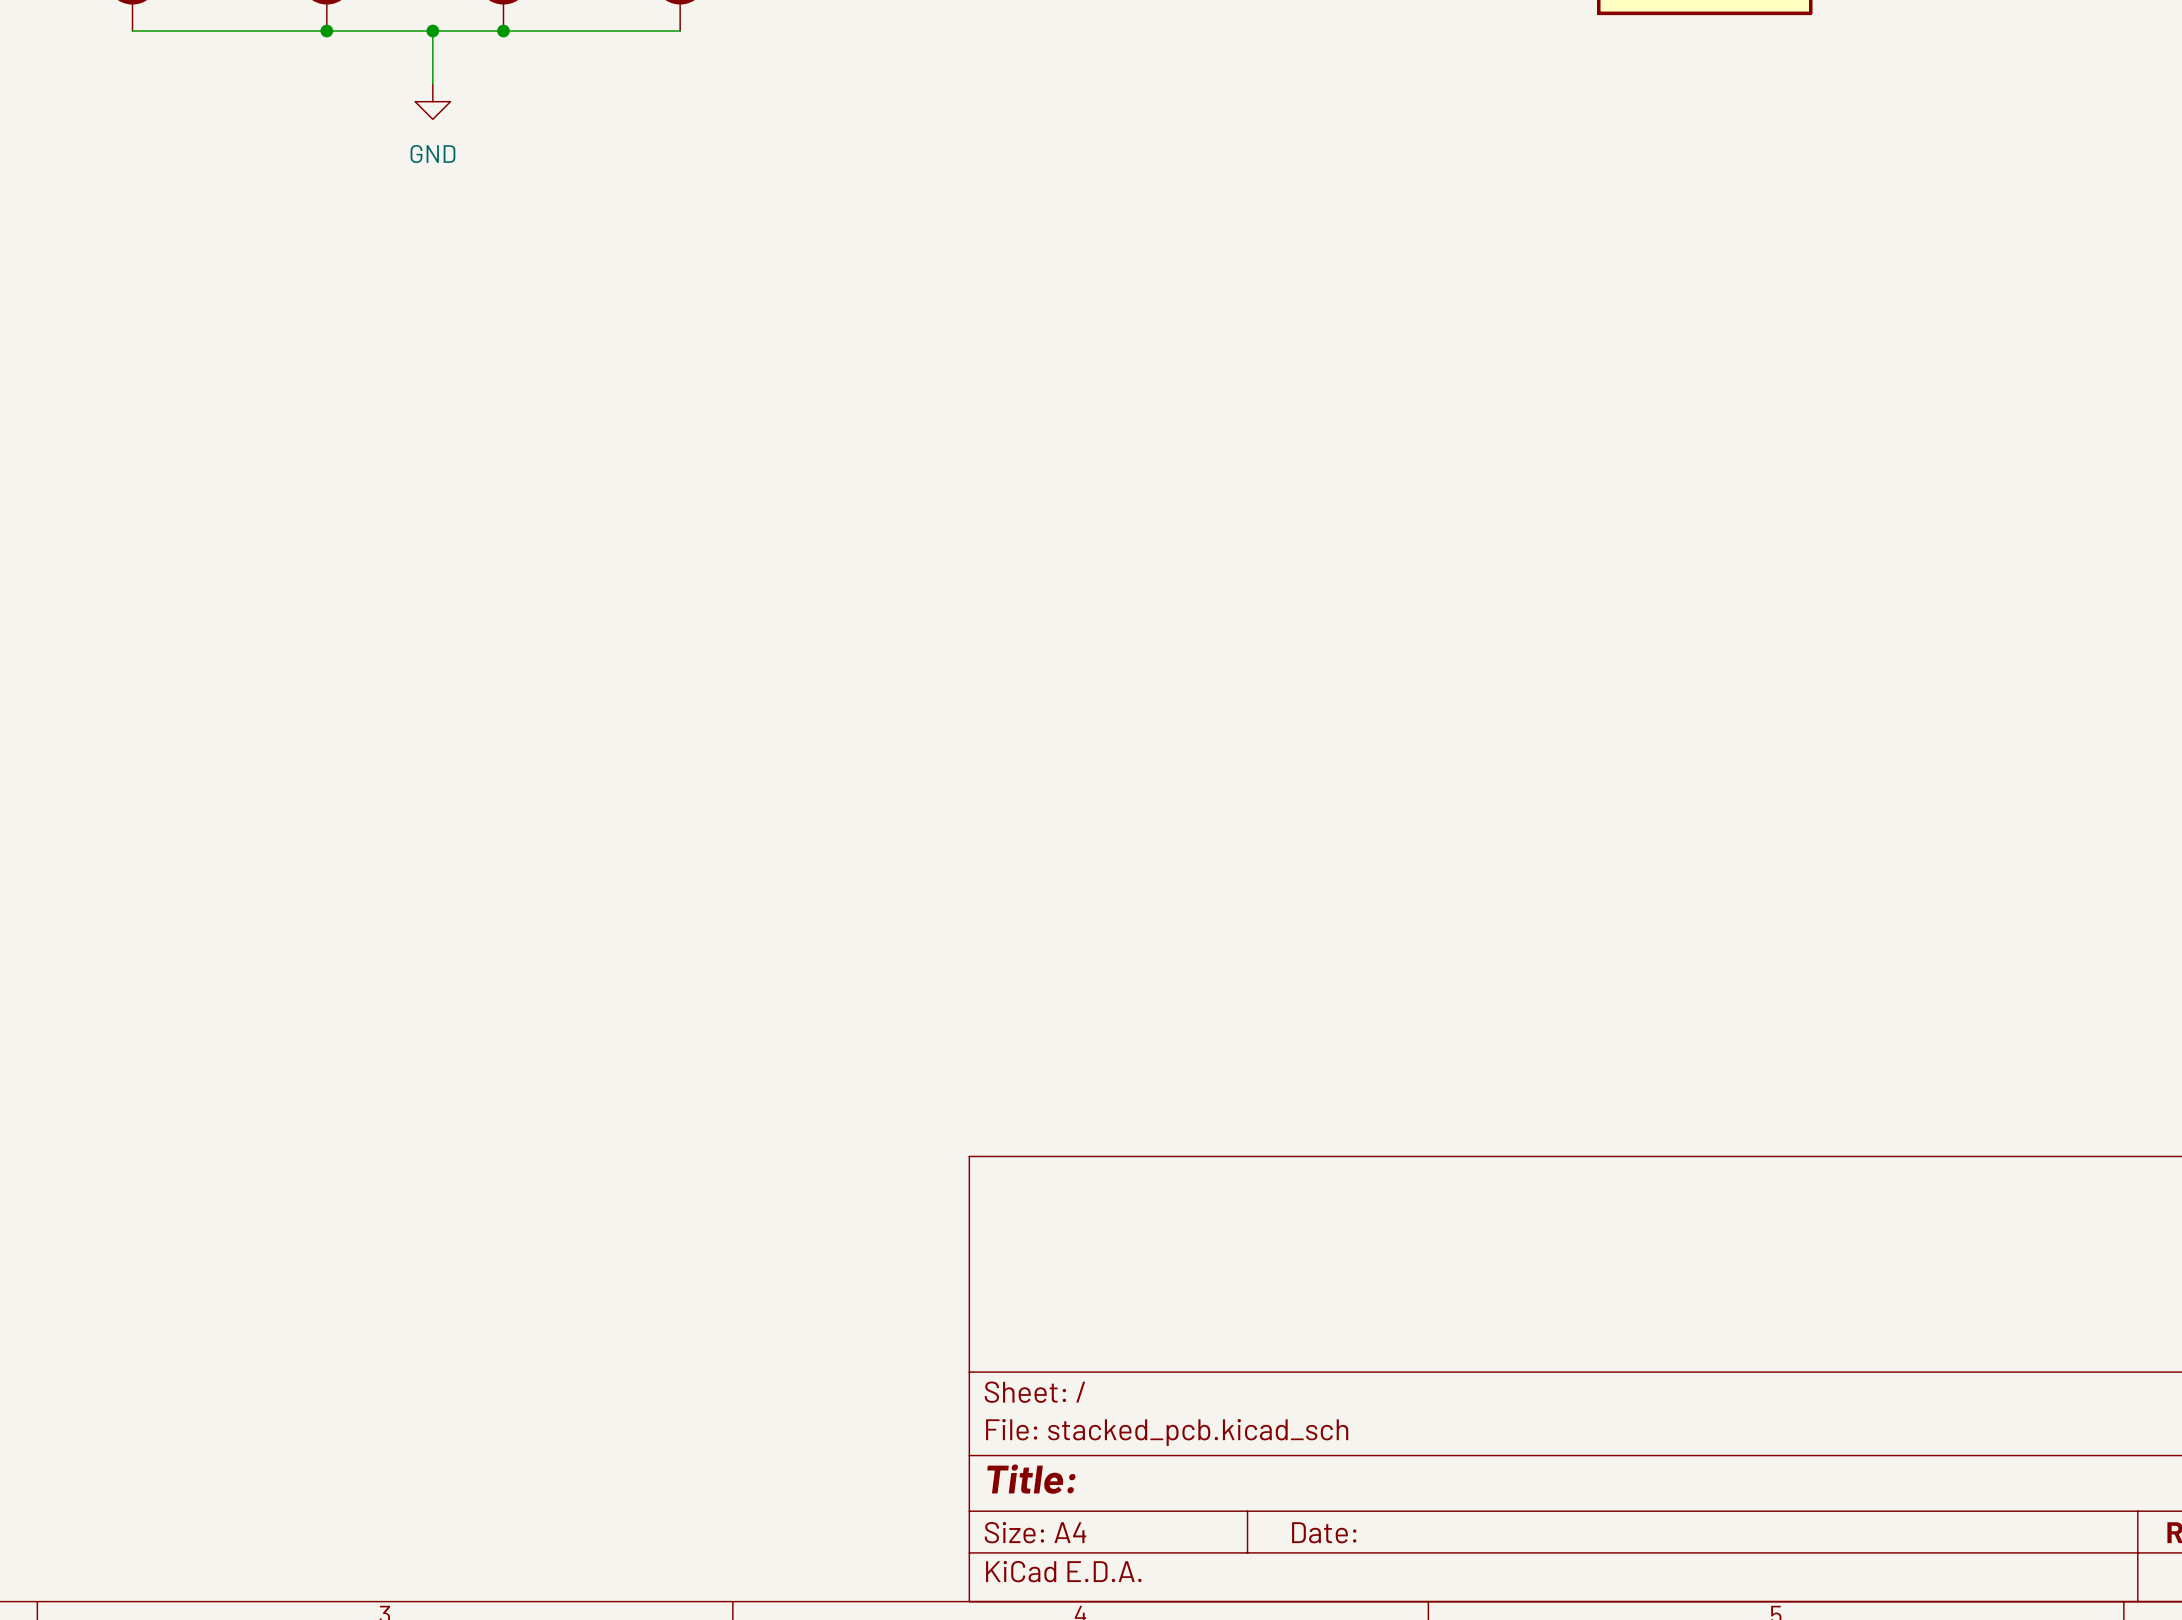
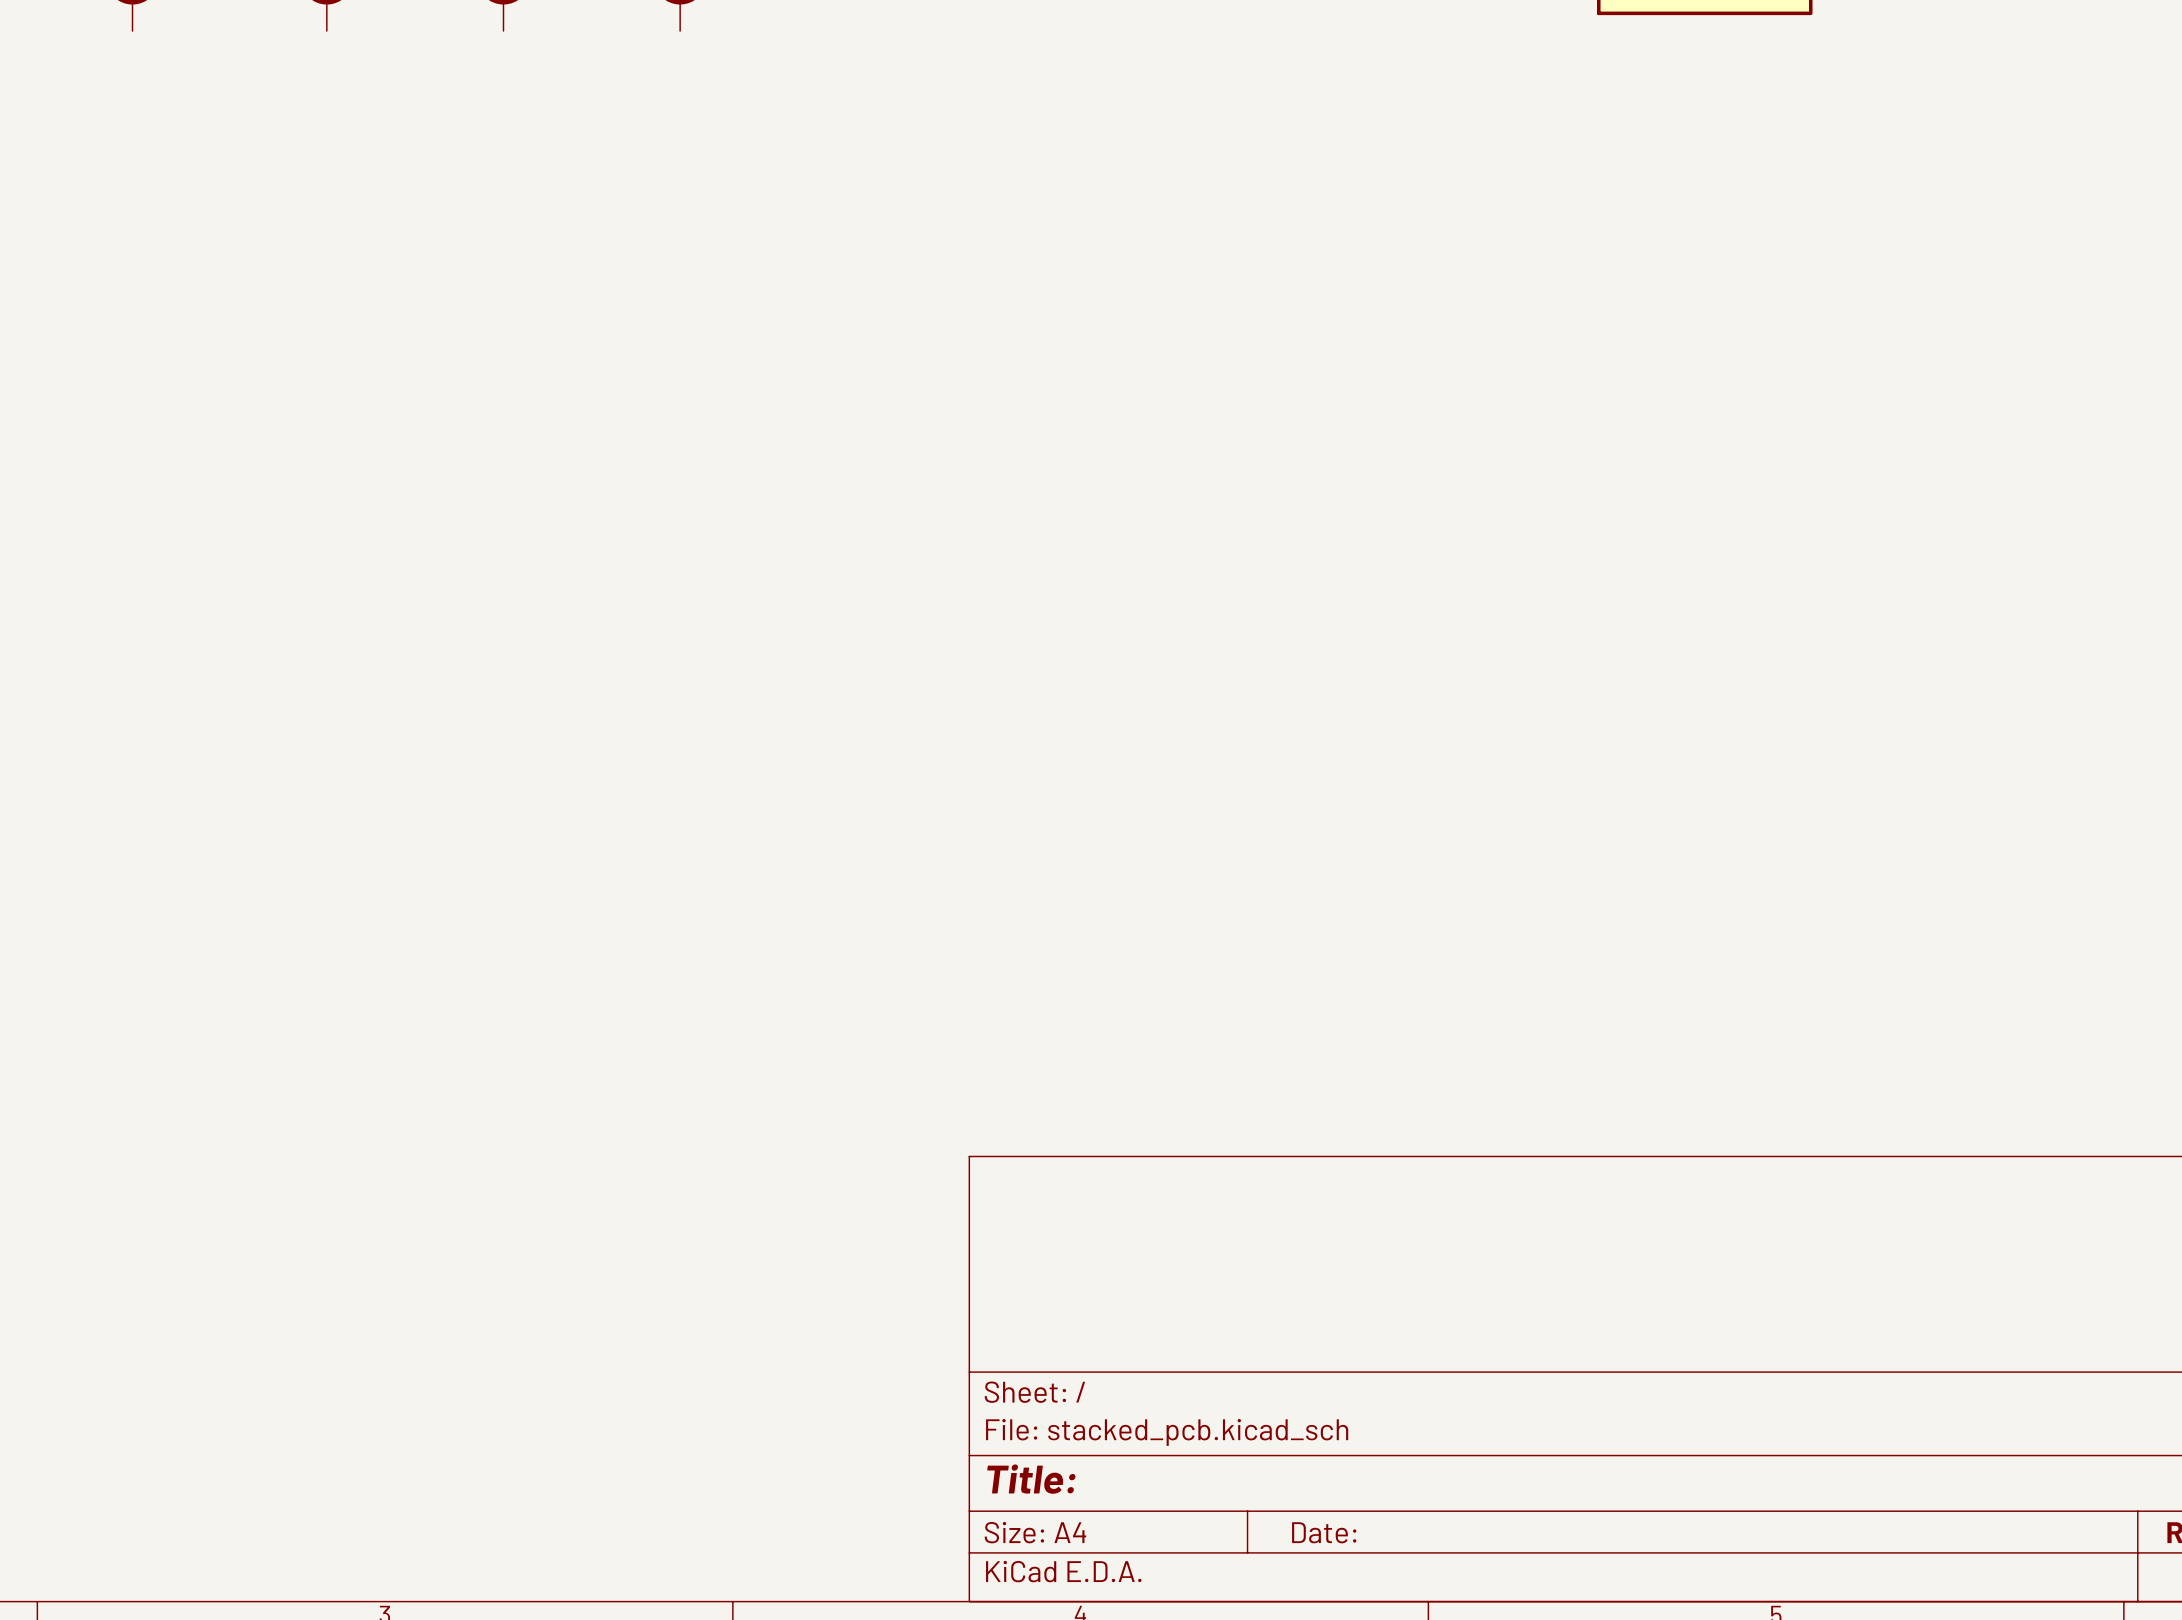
wire: (132, 31) (680, 31) -> none
junction: (326, 31) -> none
wire: (432, 31) (432, 84) -> none
junction: (432, 31) -> none
junction: (503, 31) -> none
power symbol: GND (432, 101) -> none

